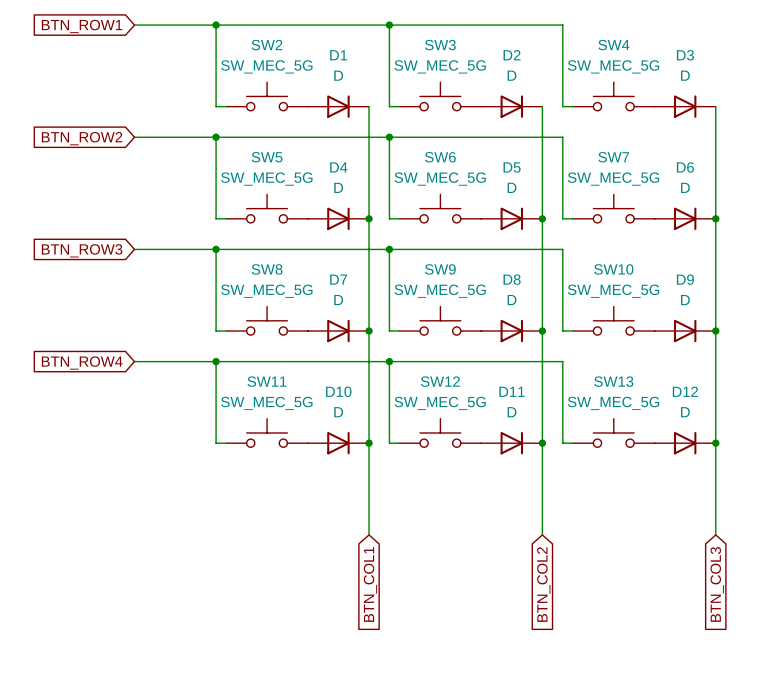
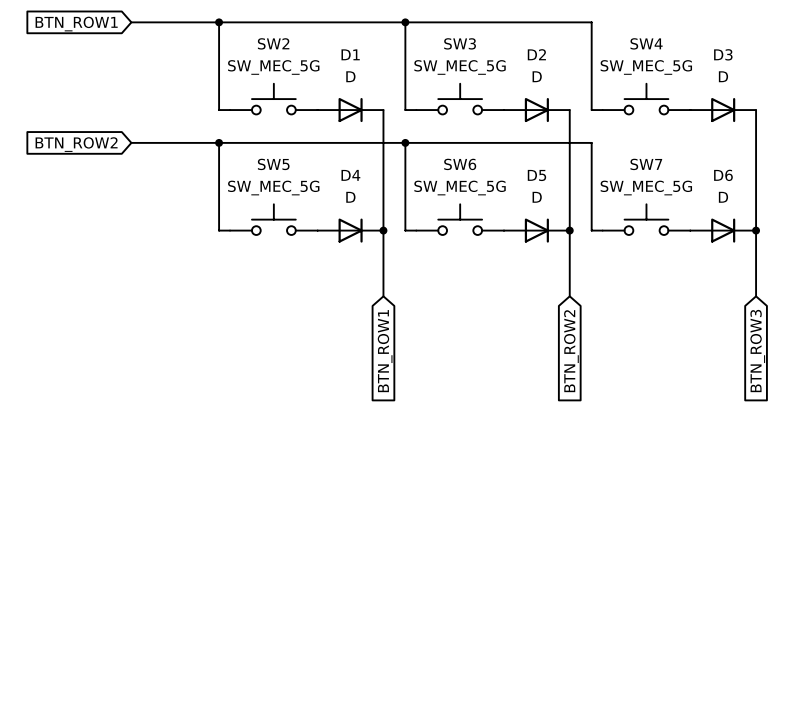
wire: (134, 249) (562, 249) (562, 331) (572, 331) -> none
wire: (216, 249) (216, 331) (226, 331) -> none
junction: (216, 249) -> none
wire: (389, 249) (389, 331) (399, 331) -> none
junction: (389, 249) -> none
global label: BTN_ROW3 (82, 250) -> none
wire: (369, 280) (369, 534) -> none
wire: (542, 280) (542, 534) -> none
wire: (715, 280) (715, 534) -> none
SW8: SW_MEC_5G (267, 320) -> none
SW9: SW_MEC_5G (440, 320) -> none
SW10: SW_MEC_5G (613, 320) -> none
D7: D (338, 331) -> none
junction: (369, 331) -> none
D8: D (511, 331) -> none
junction: (542, 331) -> none
D9: D (685, 331) -> none
junction: (715, 331) -> none
global label: none -> BTN_ROW1 (385, 351)
global label: none -> BTN_ROW2 (571, 351)
global label: none -> BTN_ROW3 (757, 351)
wire: (134, 361) (562, 361) (562, 443) (572, 443) -> none
wire: (216, 361) (216, 443) (226, 443) -> none
junction: (216, 361) -> none
wire: (389, 361) (389, 443) (399, 443) -> none
junction: (389, 361) -> none
global label: BTN_ROW4 (82, 363) -> none
SW11: SW_MEC_5G (267, 432) -> none
SW12: SW_MEC_5G (440, 432) -> none
SW13: SW_MEC_5G (613, 432) -> none
D10: D (338, 443) -> none
junction: (369, 443) -> none
D11: D (511, 443) -> none
junction: (542, 443) -> none
D12: D (685, 443) -> none
junction: (715, 443) -> none
global label: BTN_COL1 (370, 584) -> none
global label: BTN_COL2 (543, 584) -> none
global label: BTN_COL3 (717, 584) -> none

